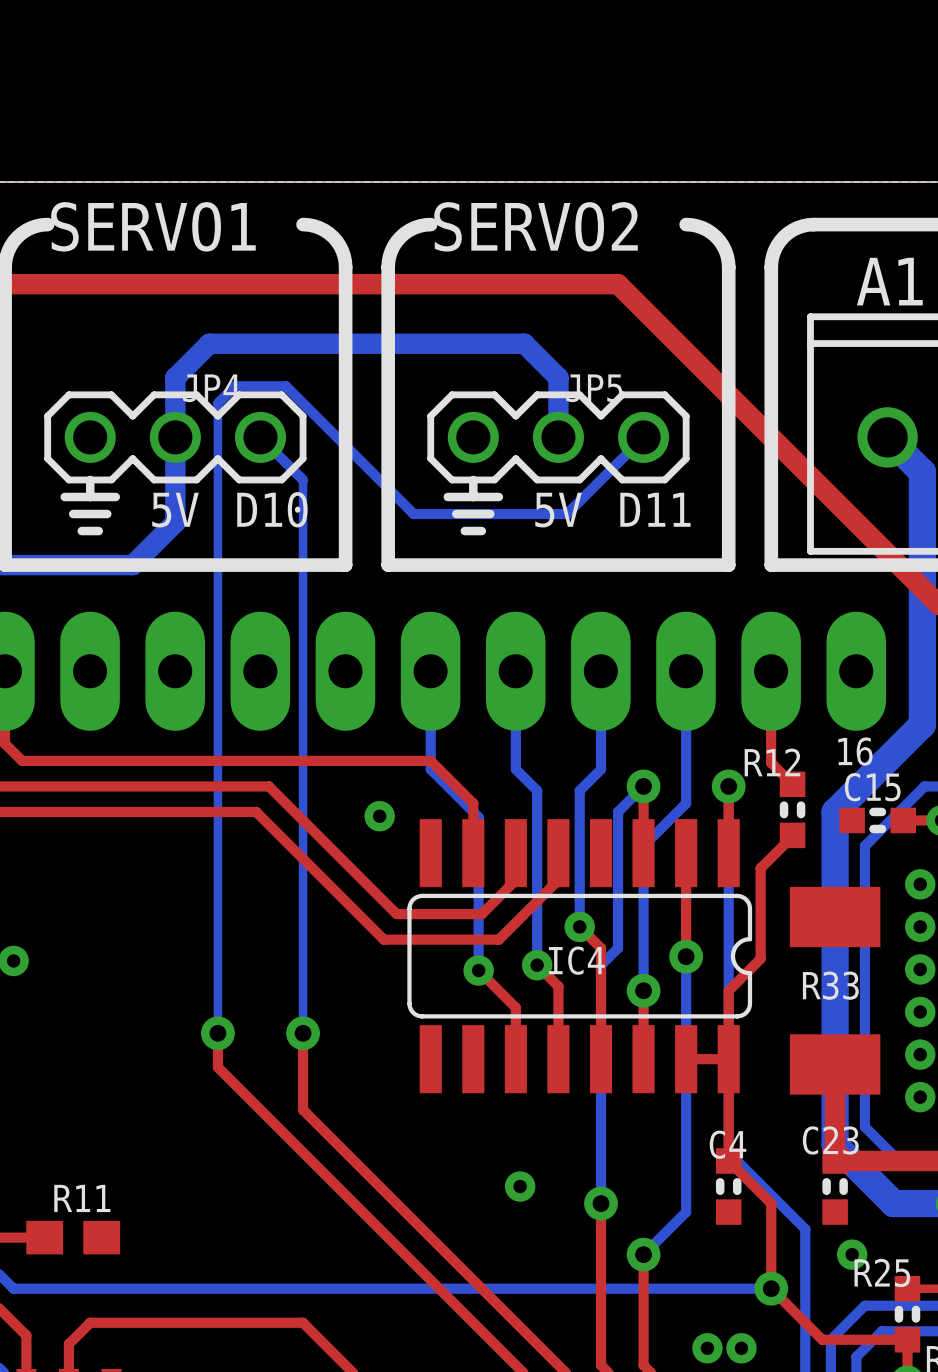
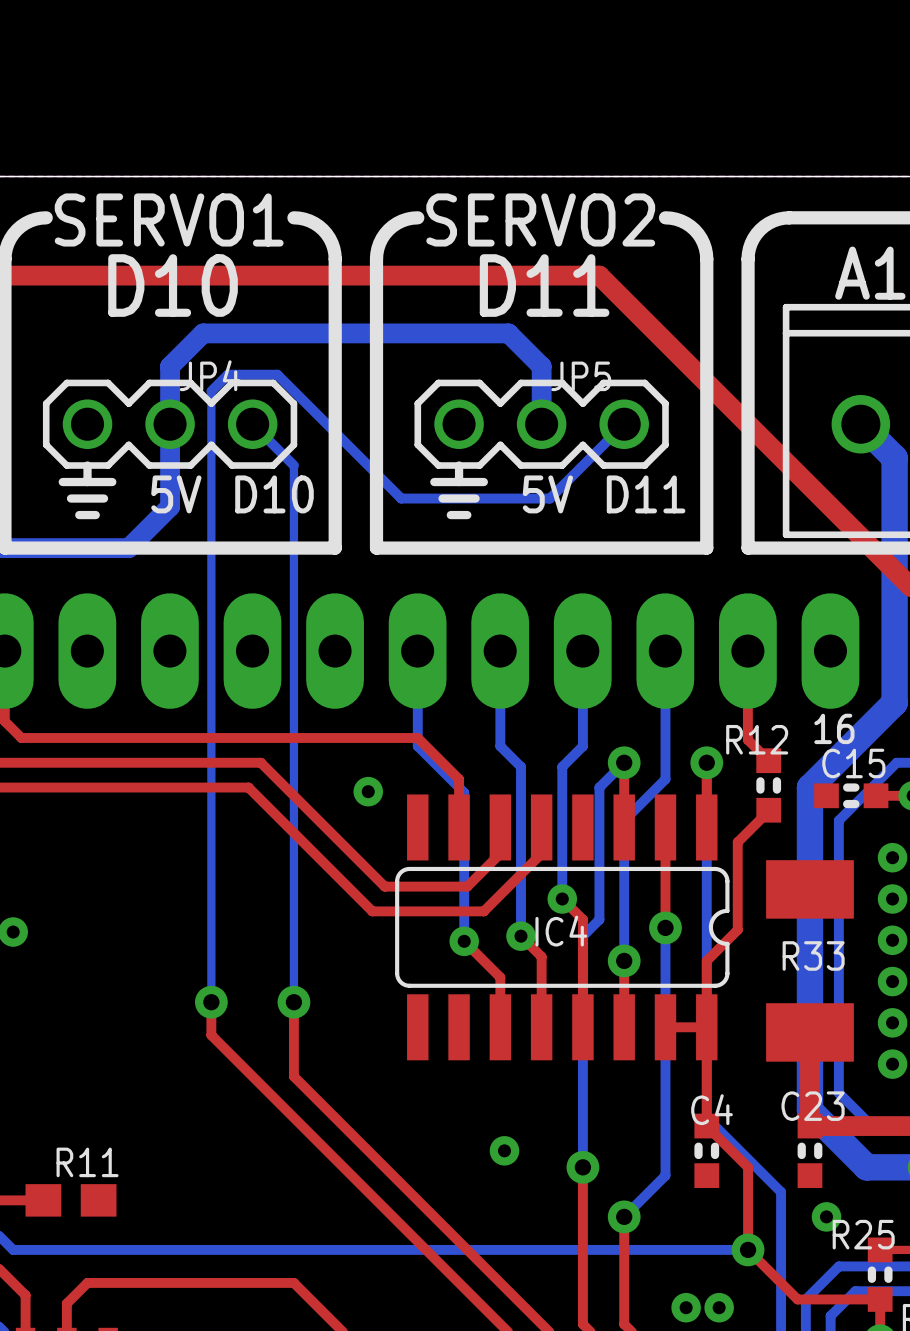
text: none -> D10 (173, 285)
text: none -> D11 (544, 285)

